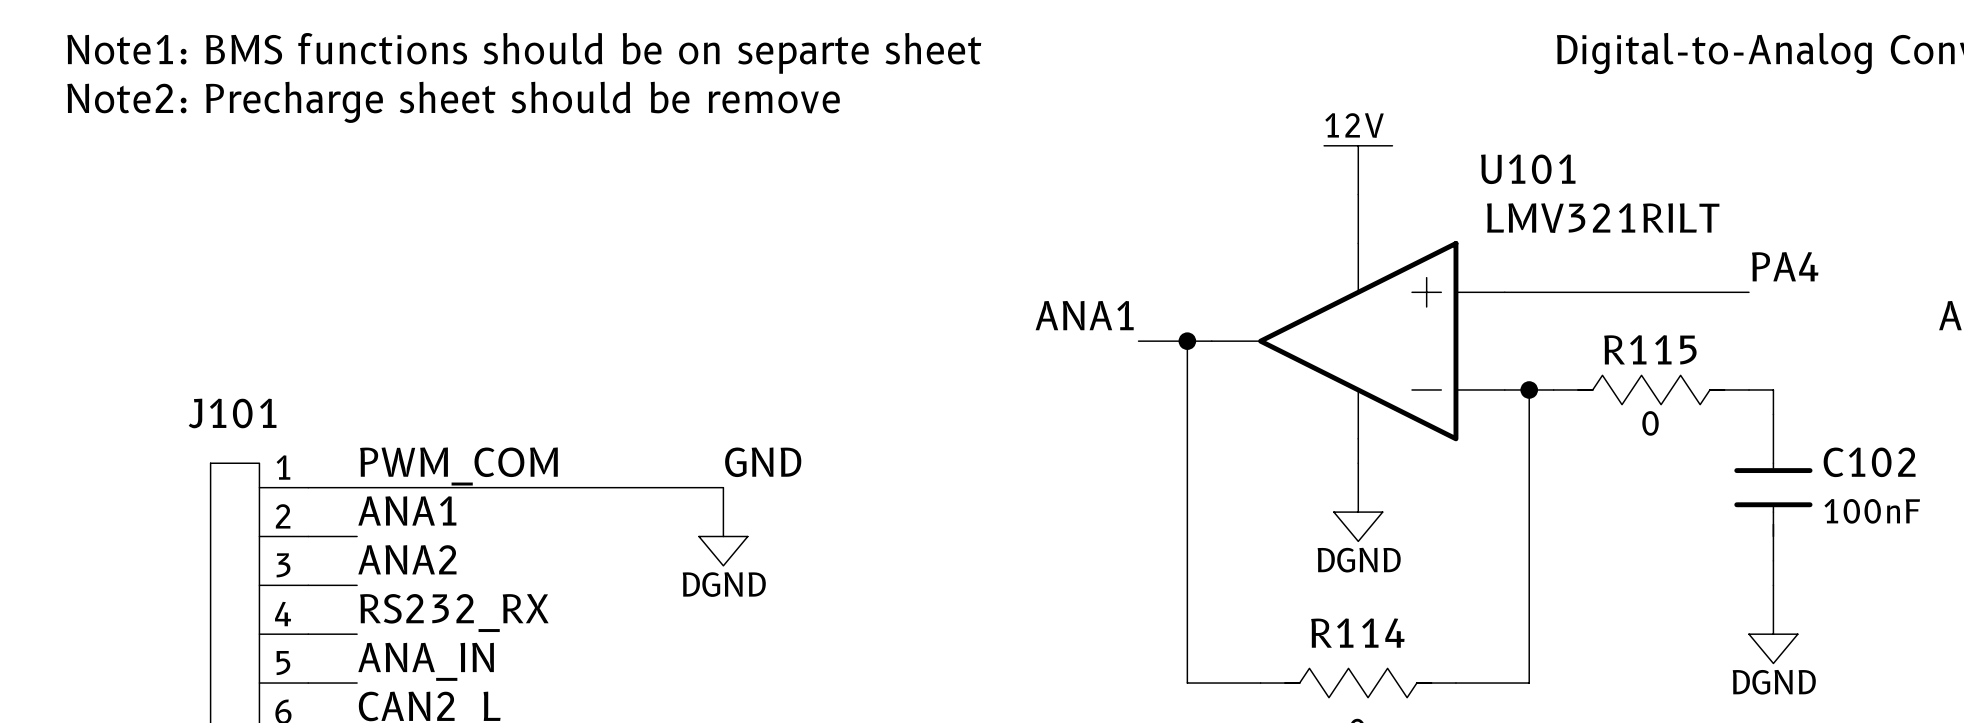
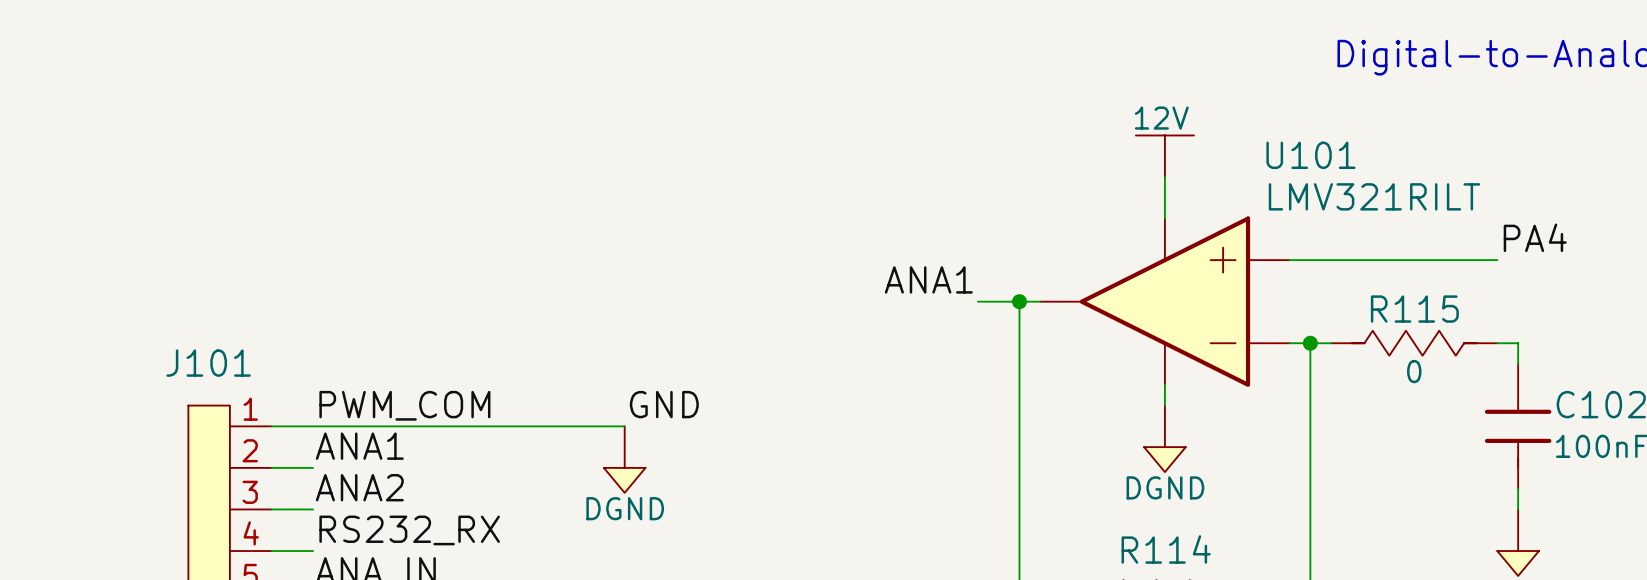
text: Note1: BMS functions should be on separte sheet (524, 53) -> none
text: Note2: Precharge sheet should be remove (453, 102) -> none

